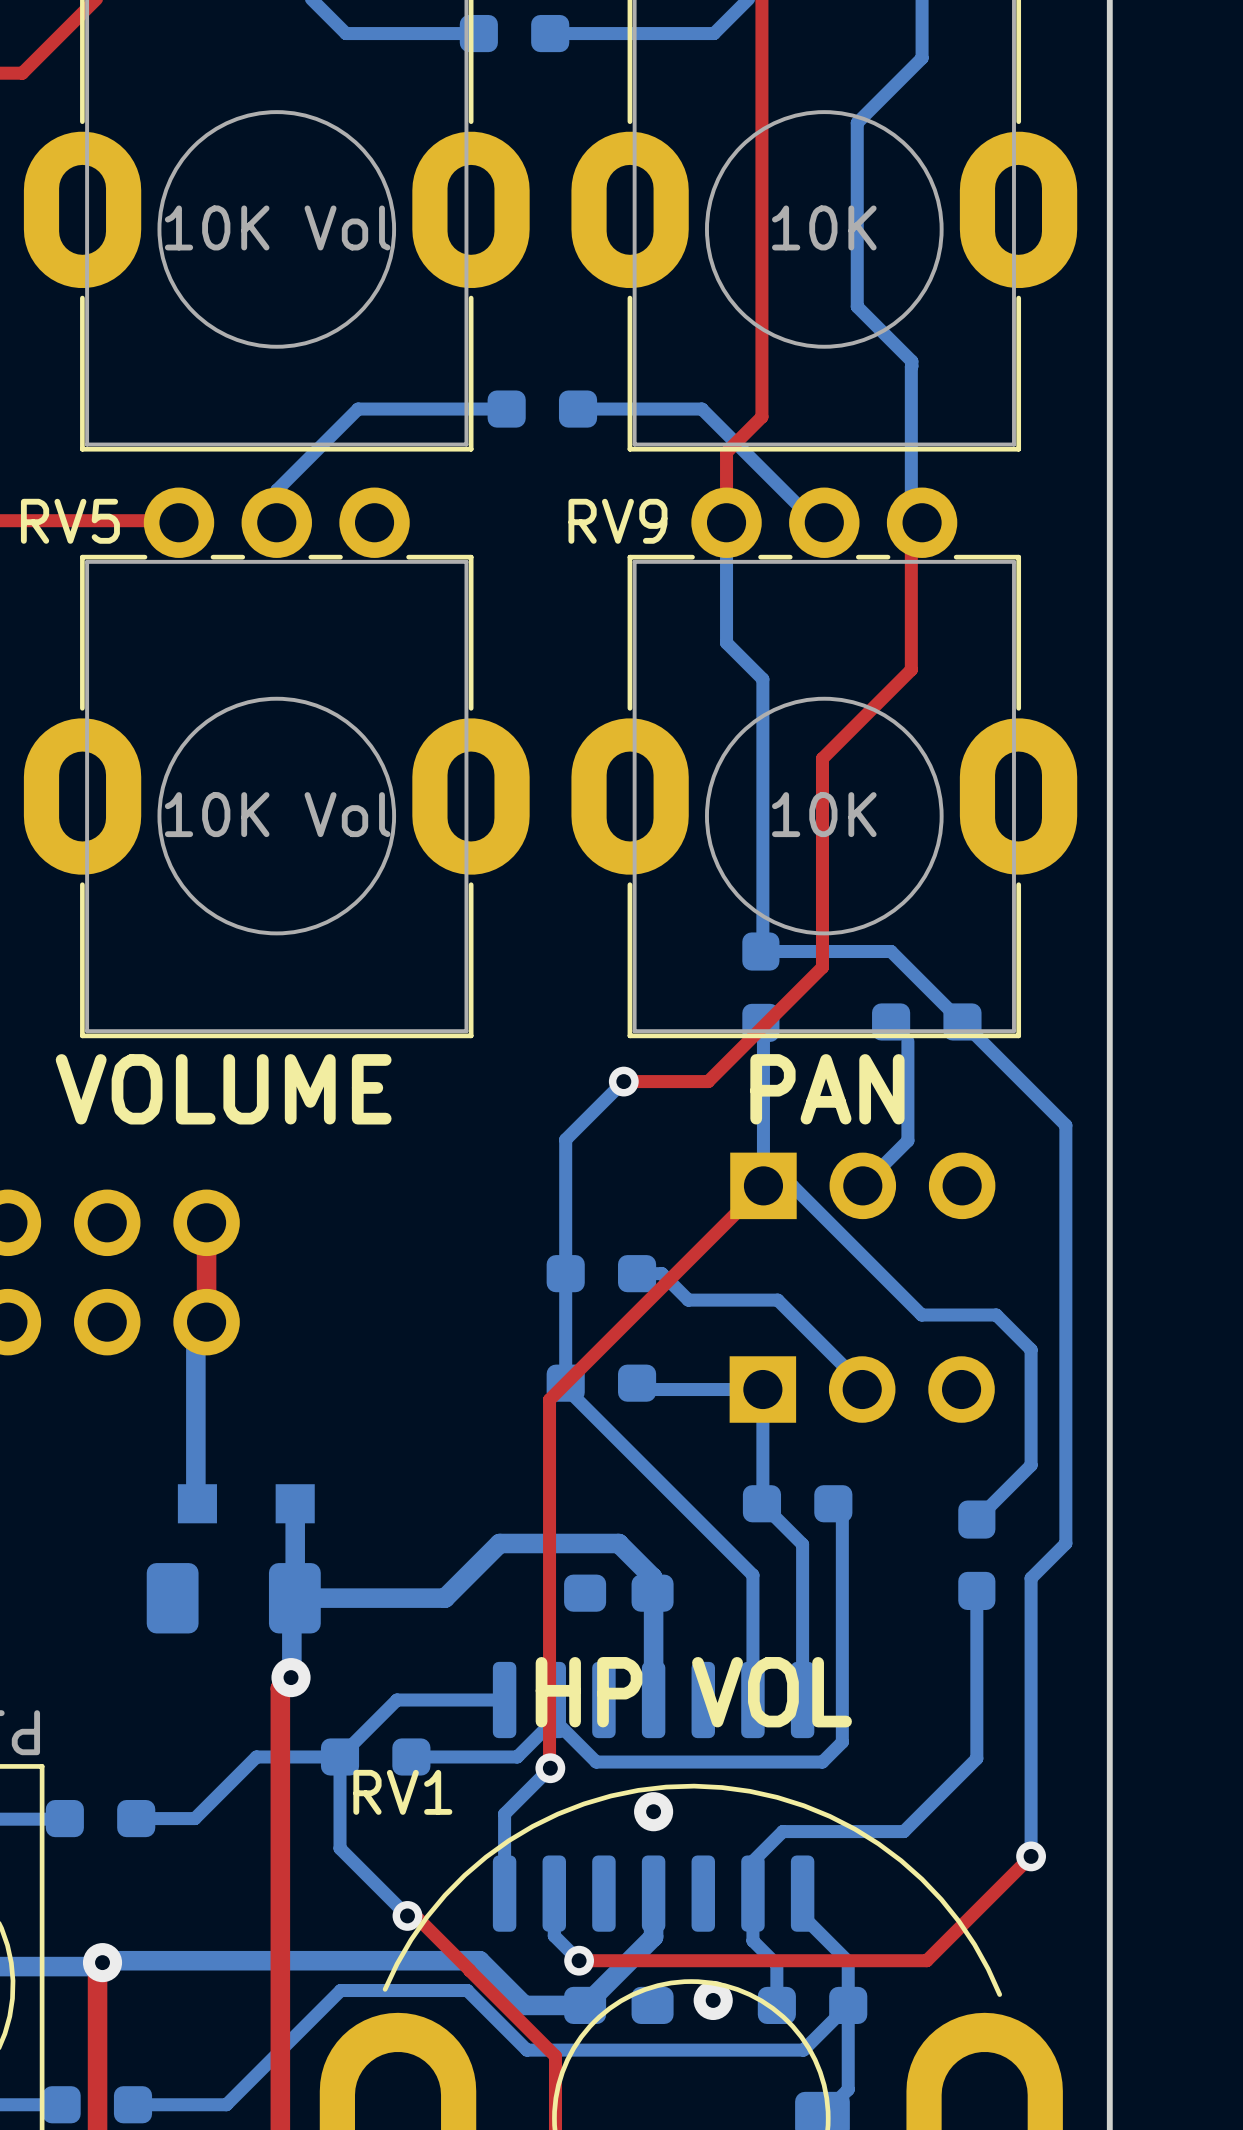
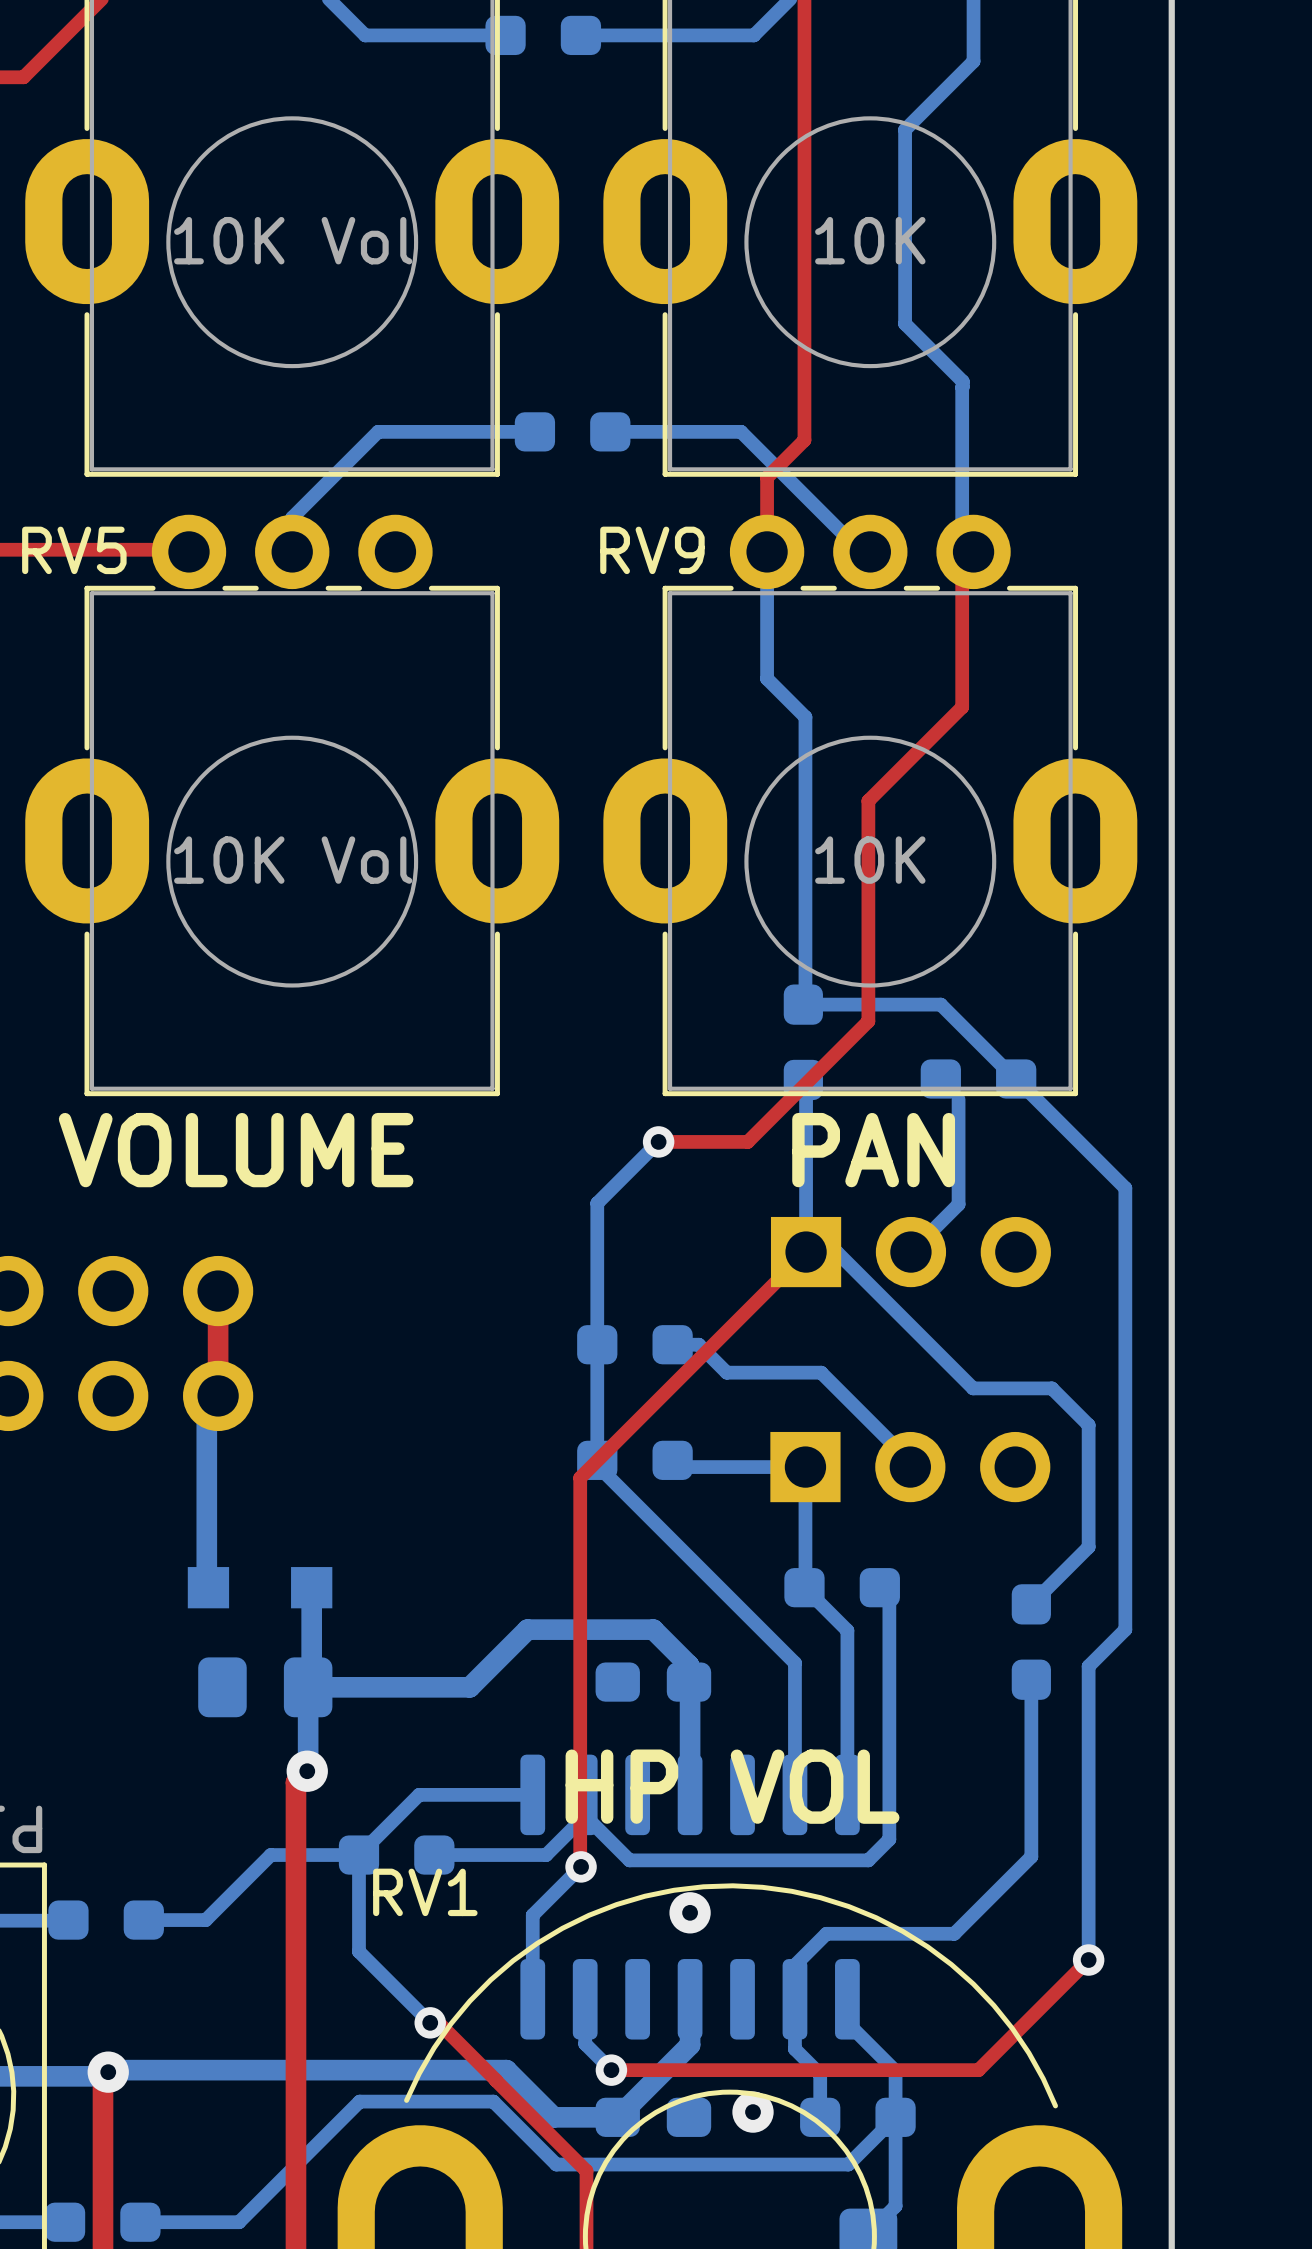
part footprint: [146, 1563, 321, 1634] -> [198, 1657, 333, 1718]

